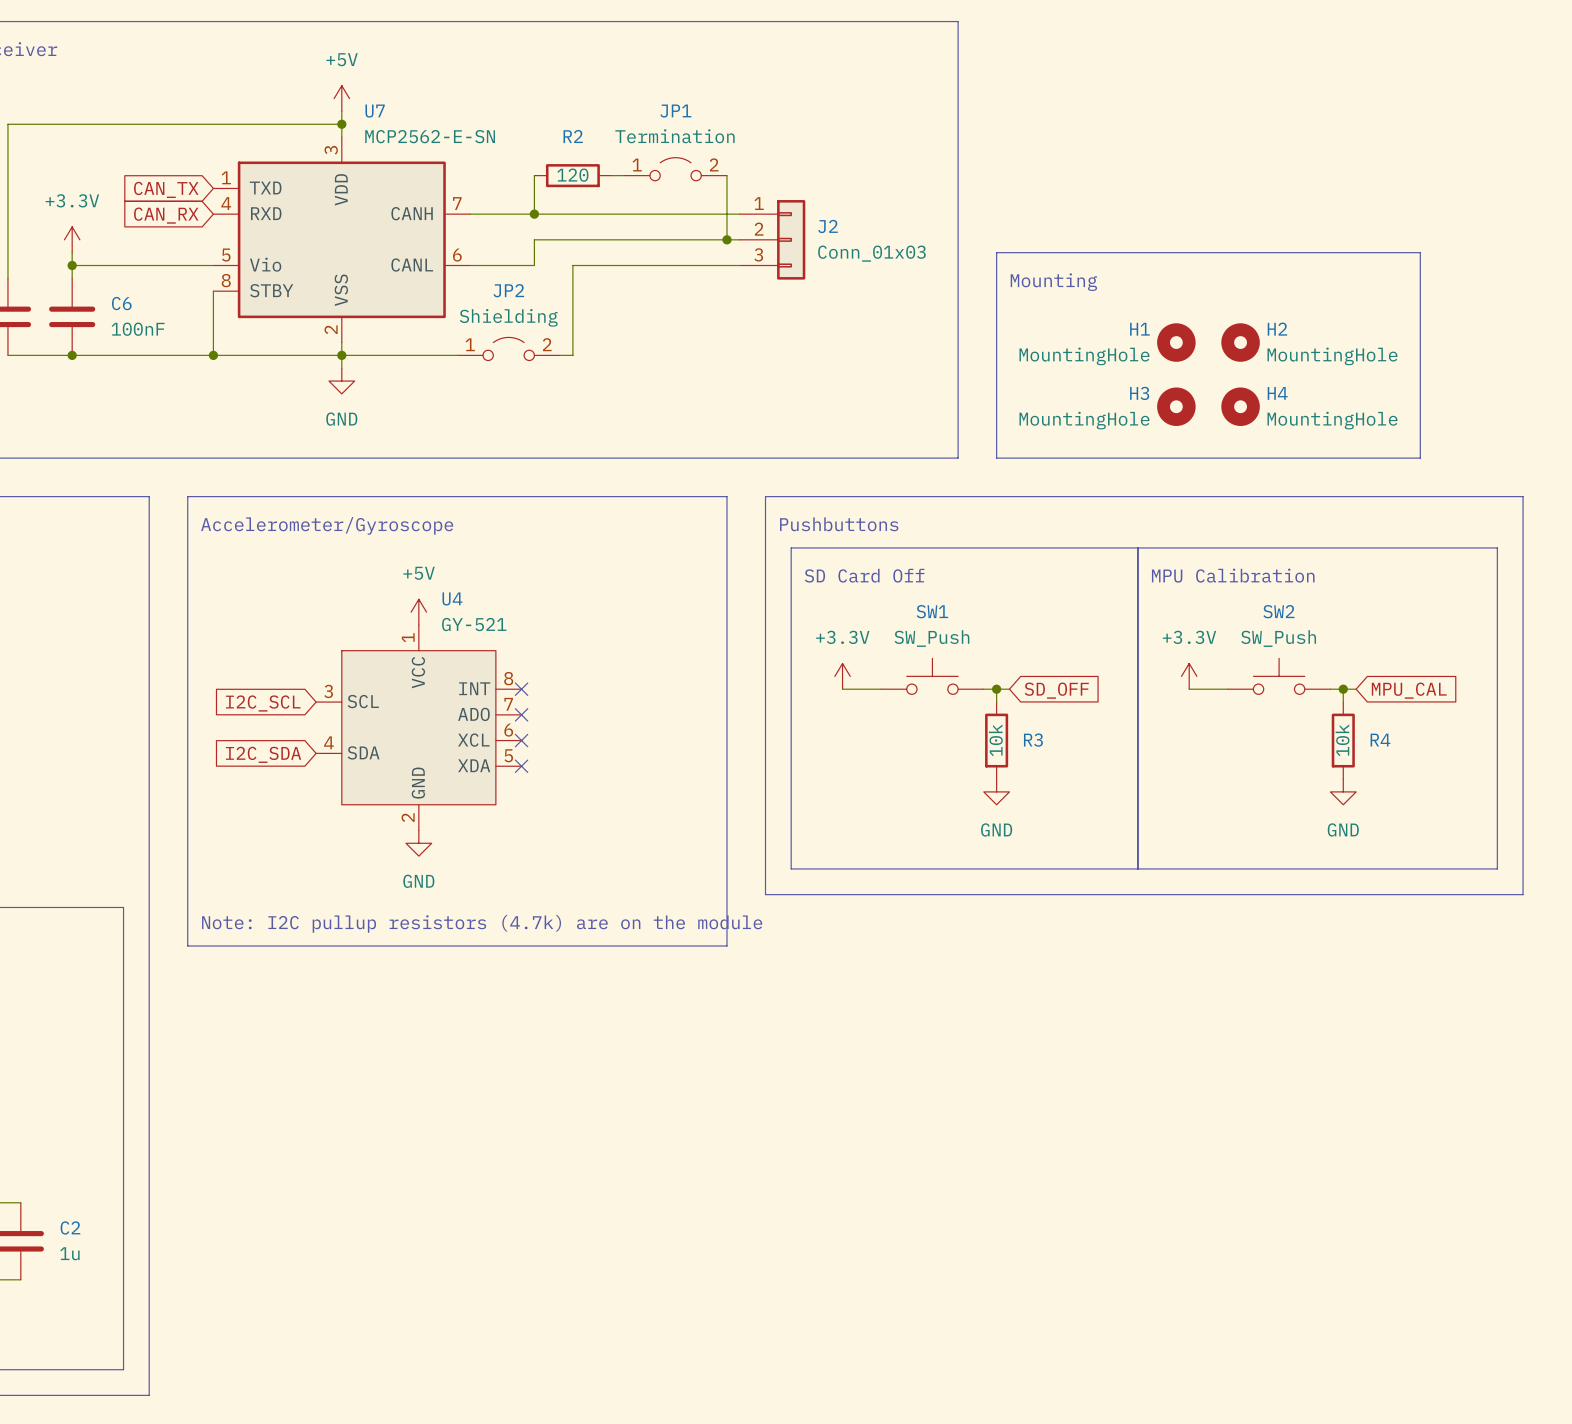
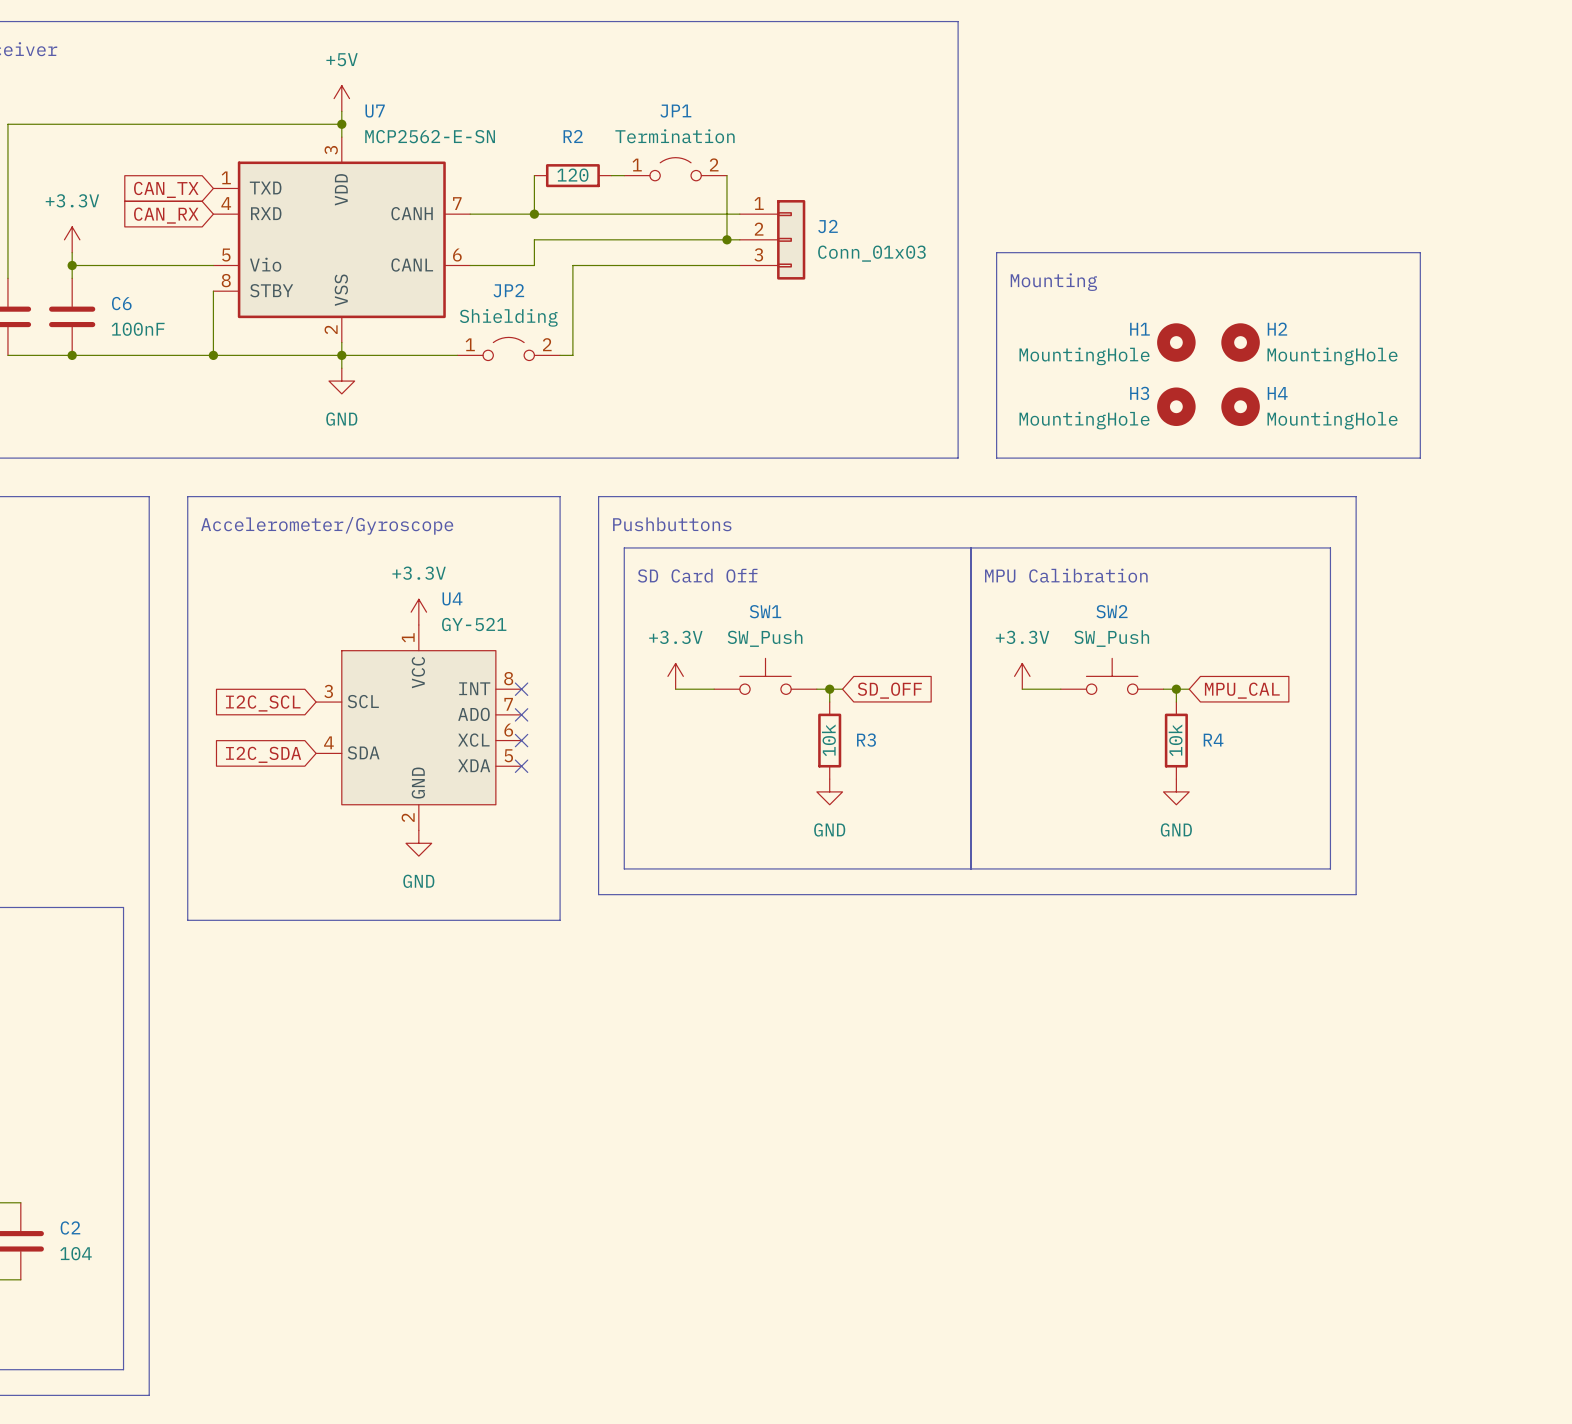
line: (560, 496) (598, 496) -> (726, 496) (765, 496)
line: (726, 496) (726, 945) (187, 945) (187, 920) -> (560, 496) (560, 920) (187, 920)
line: (765, 496) (765, 894) -> (598, 496) (598, 894) (765, 894)
line: (1356, 496) (1523, 496) (1523, 894) (1356, 894) -> (1356, 496) (1356, 894)
text position: Pushbuttons (839, 524) -> Pushbuttons (672, 524)
line: (791, 547) (791, 868) -> (791, 547) (624, 547) (624, 868) (791, 868)
line: (1137, 547) (1137, 868) -> (970, 547) (970, 868)
line: (1330, 547) (1497, 547) (1497, 868) (1330, 868) -> (1330, 547) (1330, 868)
text position: SD Card Off (864, 575) -> SD Card Off (697, 575)
text position: MPU Calibration (1233, 575) -> MPU Calibration (1066, 575)
power symbol: +5V (418, 612) -> +3.3V (418, 612)
power symbol: none -> +3.3V (675, 676)
power symbol: +3.3V (842, 676) -> none
SW1 position: (932, 676) -> (765, 676)
power symbol: none -> +3.3V (1022, 676)
power symbol: +3.3V (1189, 676) -> none
SW2 position: (1279, 676) -> (1112, 676)
wire: none -> (675, 689) (714, 689)
junction: none -> (829, 689)
wire: (842, 689) (881, 689) -> (842, 689) (816, 689)
wire: (983, 689) (1009, 689) -> none
wire: (996, 689) (996, 702) -> (829, 689) (829, 702)
junction: (996, 689) -> none
wire: none -> (1022, 689) (1060, 689)
junction: none -> (1176, 689)
wire: (1189, 689) (1227, 689) -> (1189, 689) (1163, 689)
wire: (1330, 689) (1356, 689) -> none
wire: (1343, 689) (1343, 702) -> (1176, 689) (1176, 702)
junction: (1343, 689) -> none
global label position: SD_OFF (1056, 690) -> SD_OFF (889, 690)
global label position: MPU_CAL (1409, 690) -> MPU_CAL (1242, 690)
R3 position: (996, 740) -> (829, 740)
R4 position: (1343, 740) -> (1176, 740)
power symbol: none -> GND (829, 791)
power symbol: GND (996, 791) -> none
power symbol: none -> GND (1176, 791)
power symbol: GND (1343, 791) -> none
text: Note: I2C pullup resistors (4.7k) are on the module (482, 923) -> none
C2 value: 1u (69, 1253) -> 104 (76, 1253)

